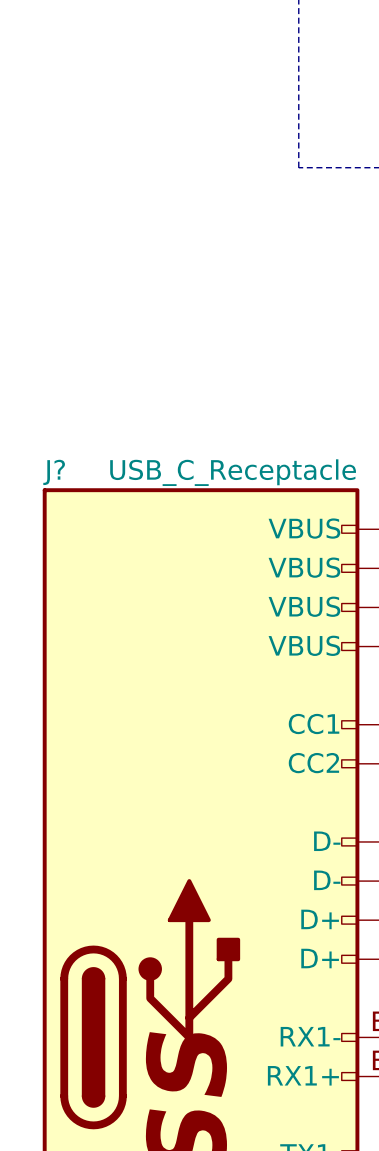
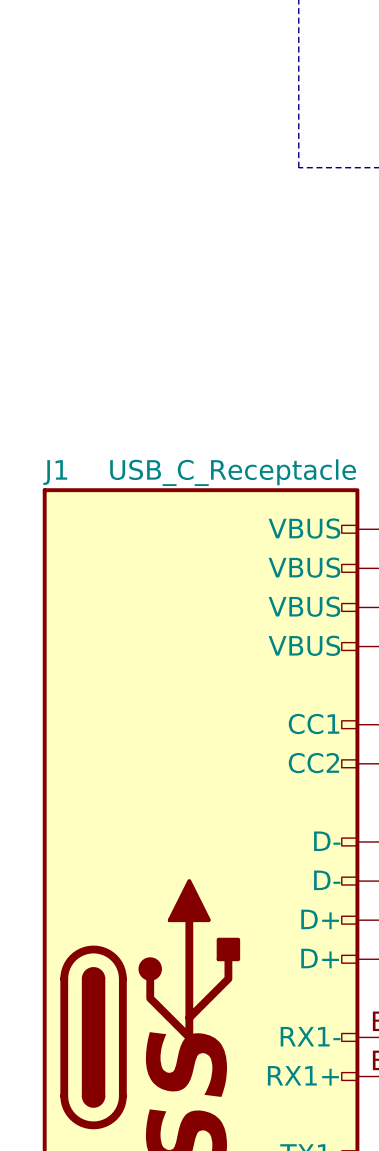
J? name: J? (54, 472) -> J1 (55, 472)

